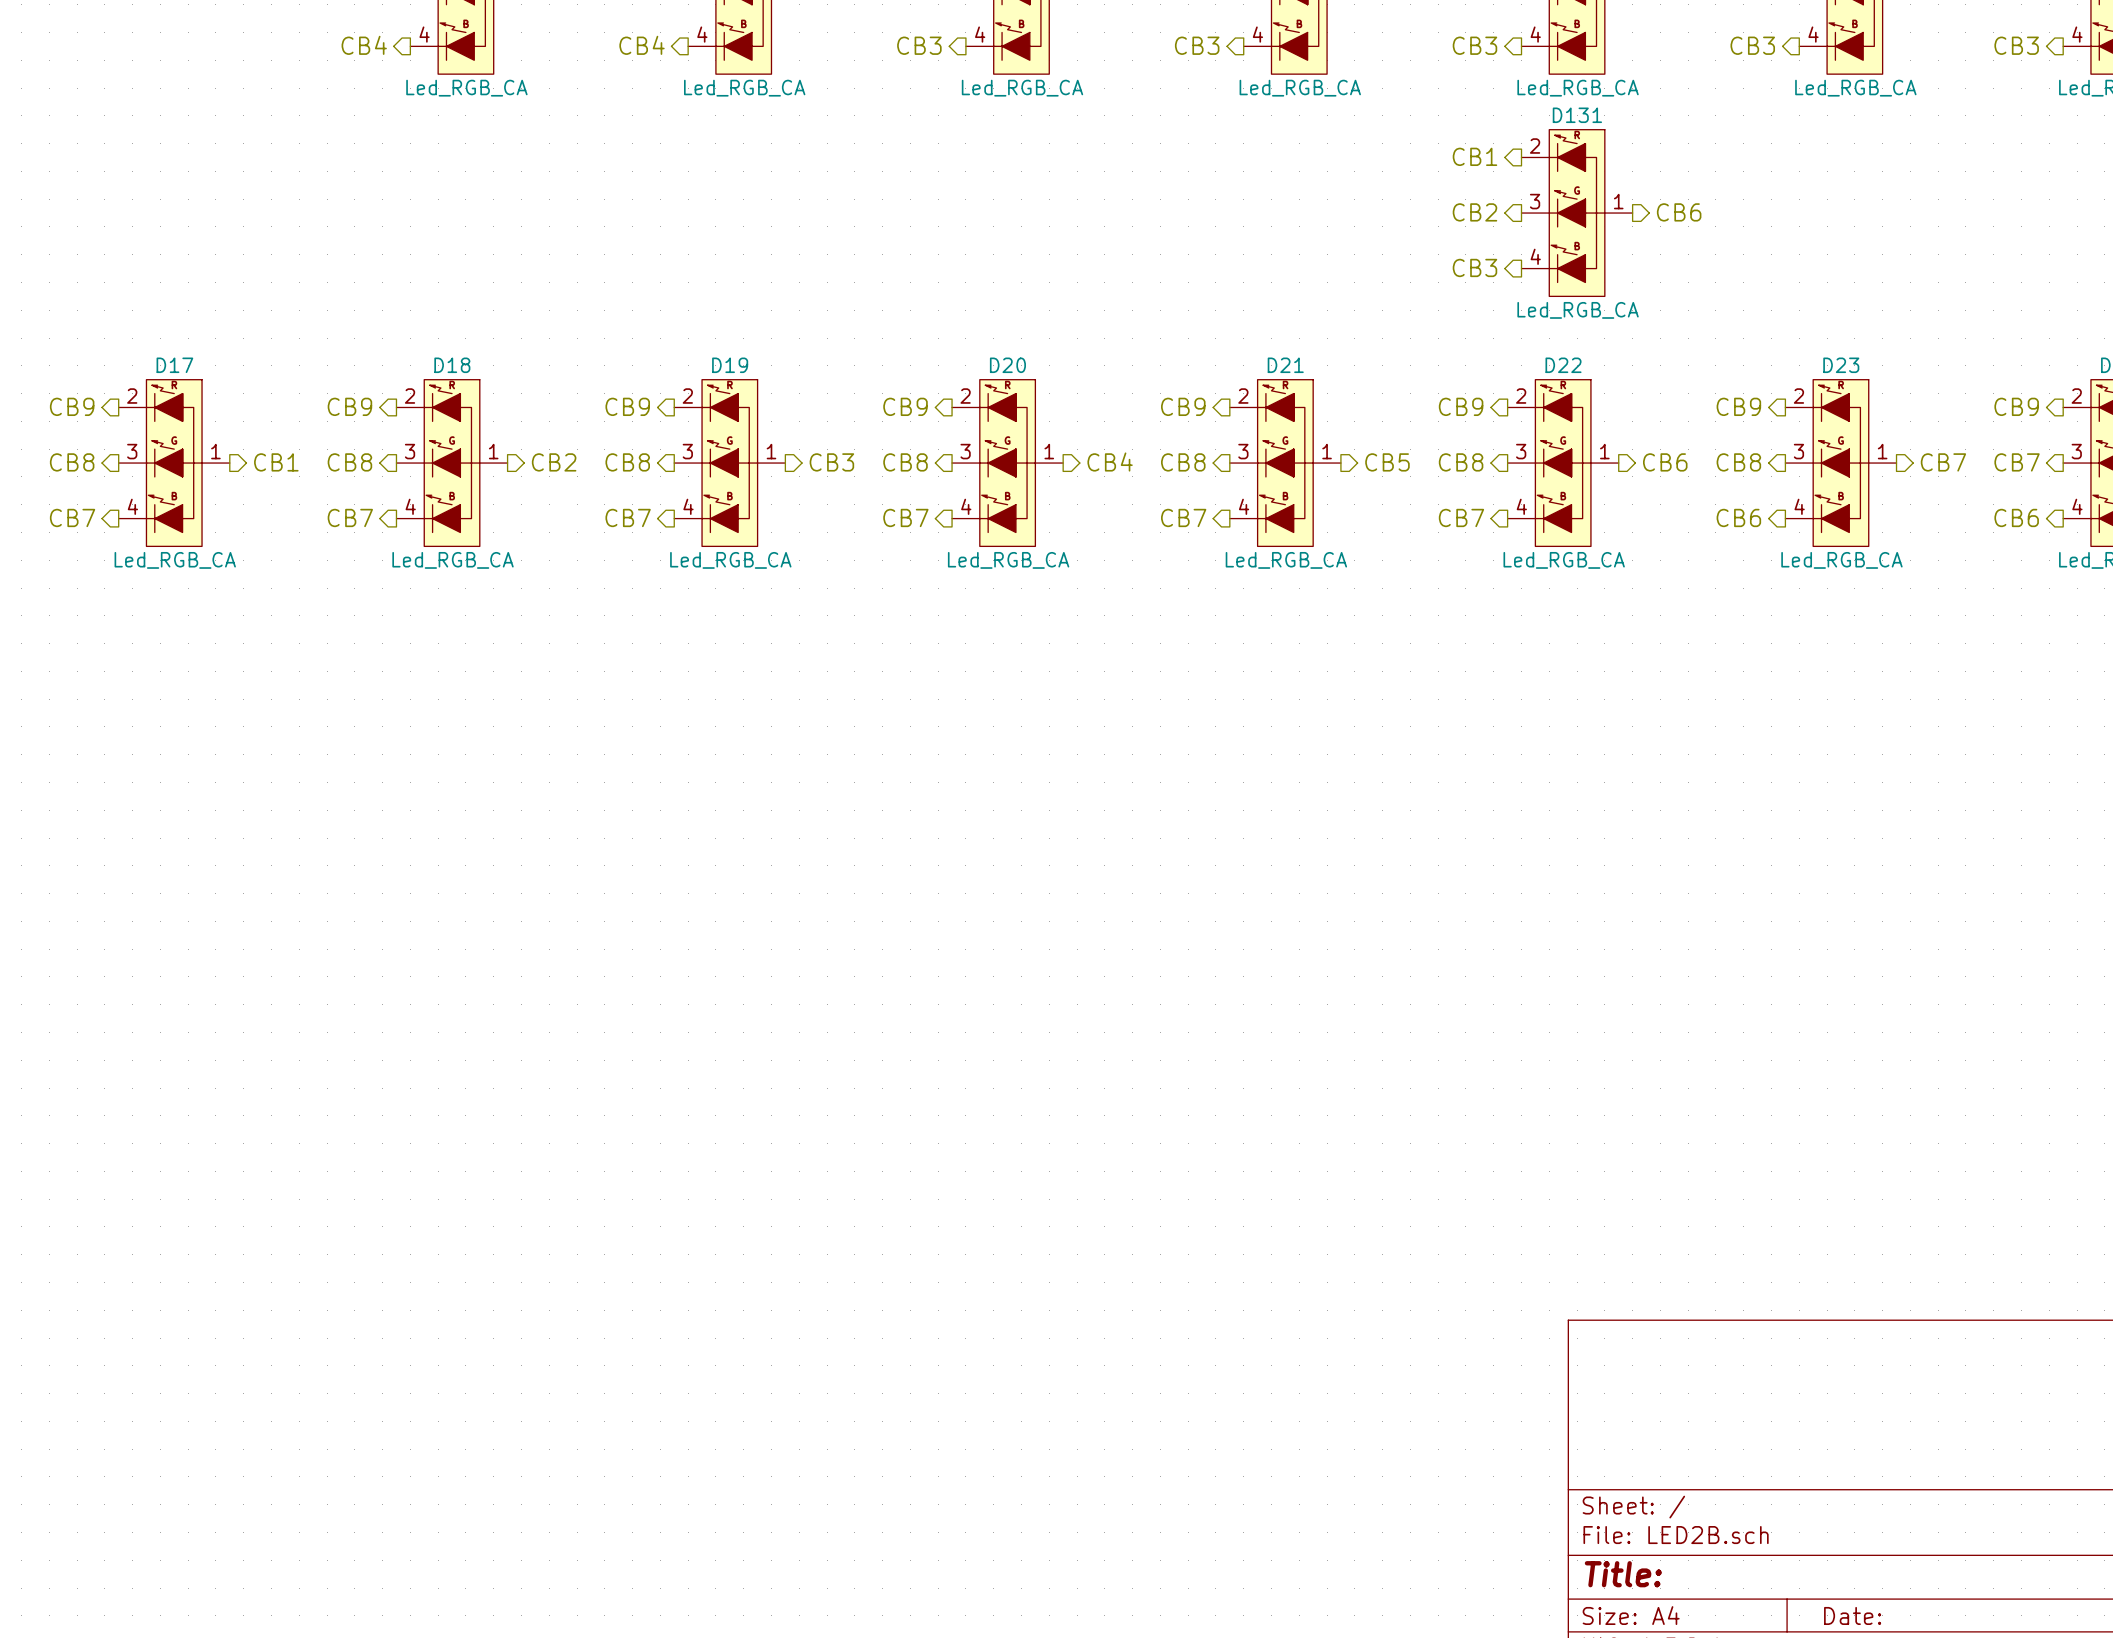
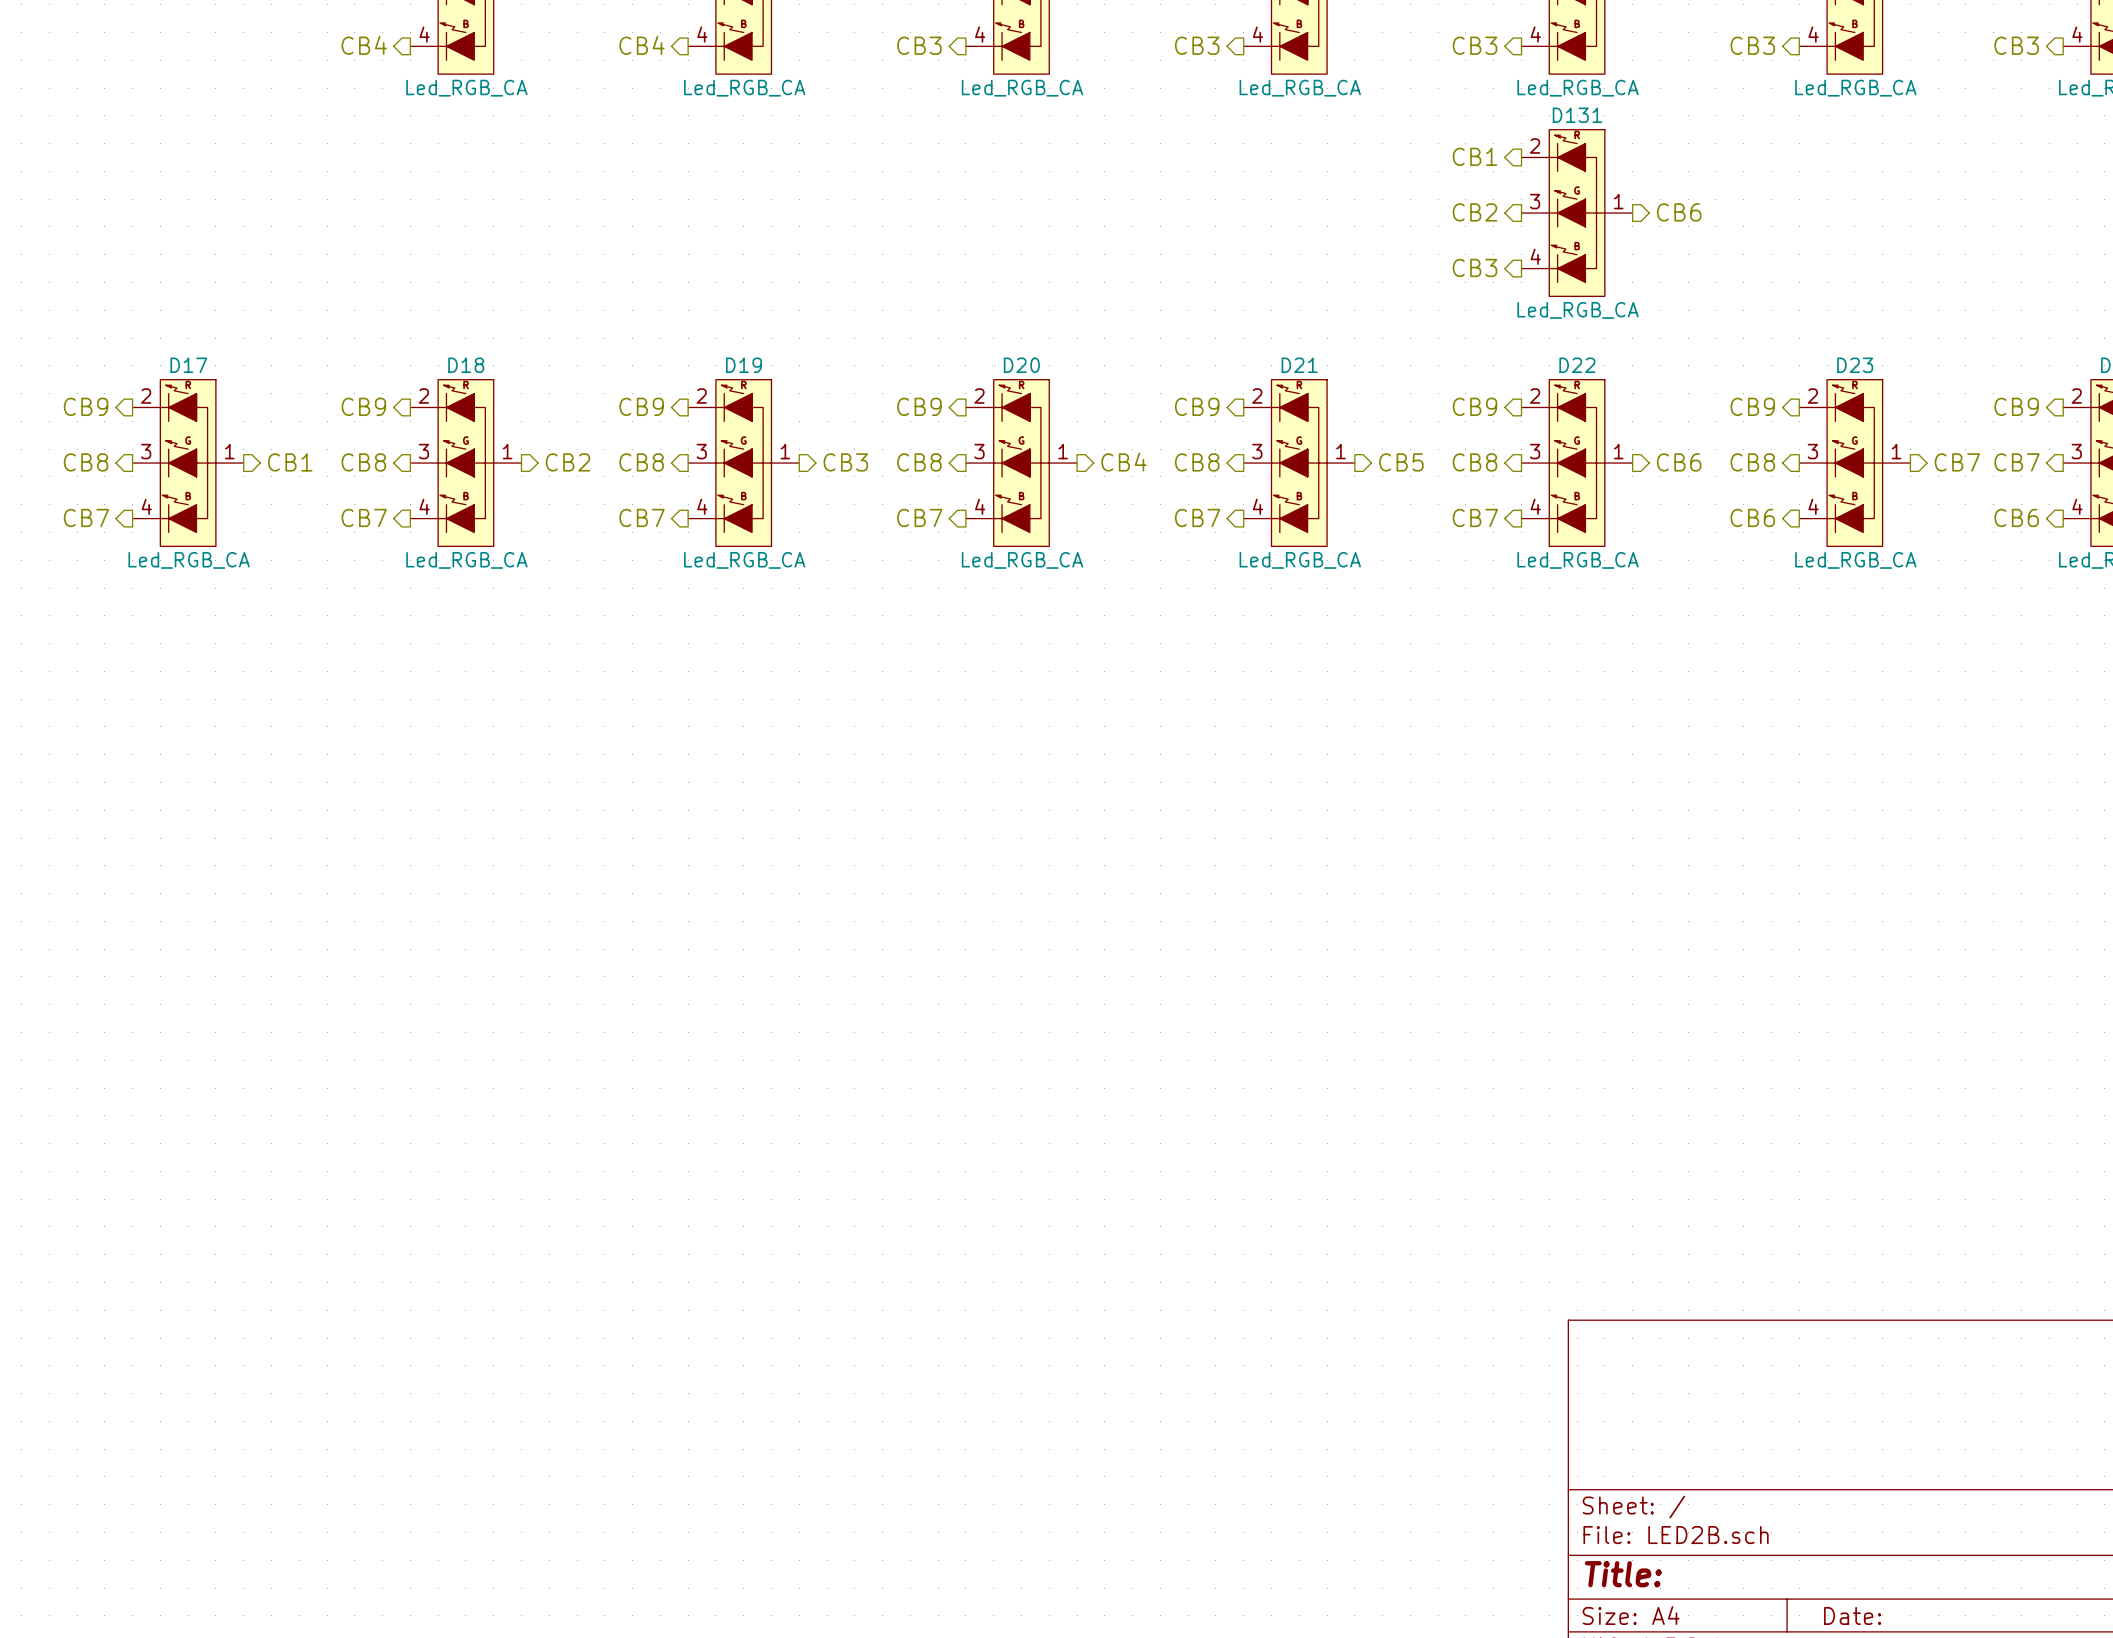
hierarchical label position: CB9 (72, 406) -> CB9 (86, 406)
hierarchical label position: CB9 (349, 406) -> CB9 (363, 406)
hierarchical label position: CB9 (627, 406) -> CB9 (641, 406)
hierarchical label position: CB9 (905, 406) -> CB9 (919, 406)
hierarchical label position: CB9 (1183, 406) -> CB9 (1197, 406)
hierarchical label position: CB9 (1461, 406) -> CB9 (1474, 406)
hierarchical label position: CB9 (1738, 406) -> CB9 (1752, 406)
hierarchical label position: CB8 (72, 462) -> CB8 (86, 462)
hierarchical label position: CB1 (276, 462) -> CB1 (290, 462)
hierarchical label position: CB8 (349, 462) -> CB8 (363, 462)
hierarchical label position: CB2 (554, 462) -> CB2 (568, 462)
hierarchical label position: CB8 (627, 462) -> CB8 (641, 462)
hierarchical label position: CB3 (831, 462) -> CB3 (845, 462)
hierarchical label position: CB8 (905, 462) -> CB8 (919, 462)
hierarchical label position: CB4 (1110, 462) -> CB4 (1123, 462)
hierarchical label position: CB8 (1183, 462) -> CB8 (1197, 462)
hierarchical label position: CB5 (1387, 462) -> CB5 (1401, 462)
hierarchical label position: CB8 (1461, 462) -> CB8 (1474, 462)
hierarchical label position: CB6 (1665, 462) -> CB6 (1679, 462)
hierarchical label position: CB8 (1738, 462) -> CB8 (1752, 462)
hierarchical label position: CB7 (1943, 462) -> CB7 (1957, 462)
D17 position: (174, 463) -> (188, 463)
D18 position: (452, 463) -> (465, 463)
D19 position: (729, 463) -> (743, 463)
D20 position: (1007, 463) -> (1021, 463)
D21 position: (1285, 463) -> (1299, 463)
D22 position: (1563, 463) -> (1577, 463)
D23 position: (1840, 463) -> (1854, 463)
hierarchical label position: CB7 (72, 517) -> CB7 (86, 517)
hierarchical label position: CB7 (350, 517) -> CB7 (364, 517)
hierarchical label position: CB7 (628, 517) -> CB7 (642, 517)
hierarchical label position: CB7 (905, 517) -> CB7 (919, 517)
hierarchical label position: CB7 (1183, 517) -> CB7 (1197, 517)
hierarchical label position: CB7 (1461, 517) -> CB7 (1475, 517)
hierarchical label position: CB6 (1738, 517) -> CB6 (1752, 517)

